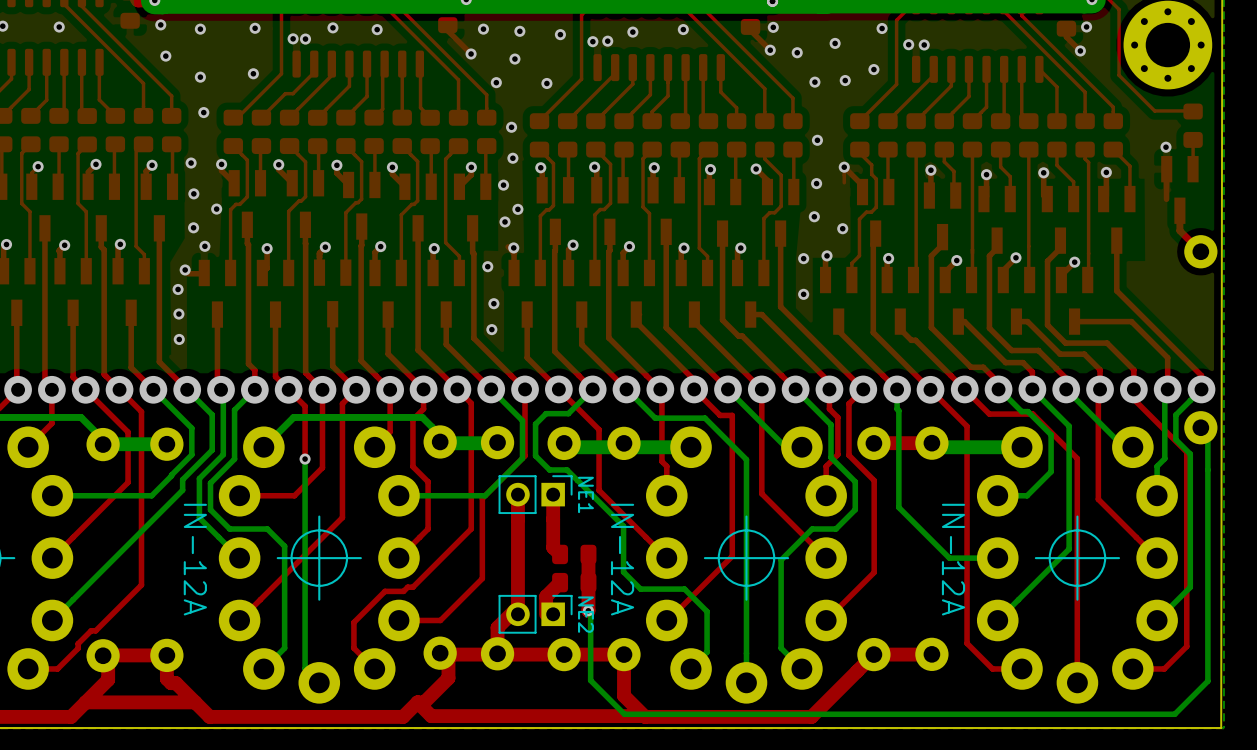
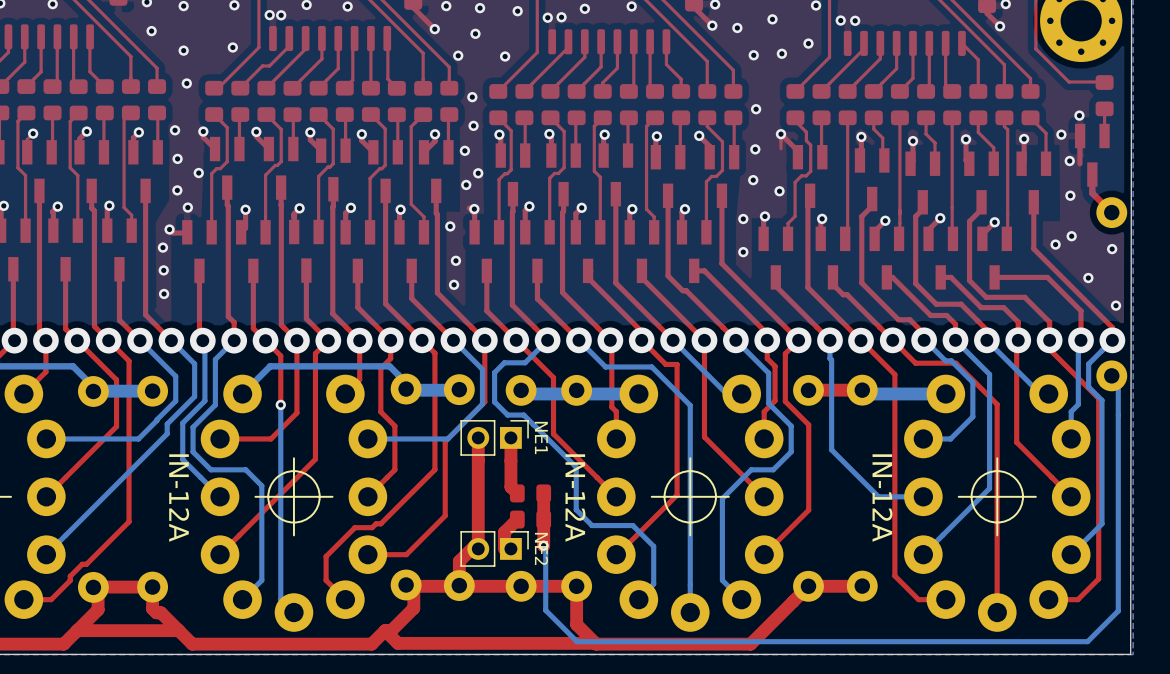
via: none -> (1061, 134)
via: none -> (1069, 161)
via: none -> (1070, 195)
via: none -> (1071, 236)
via: none -> (1055, 244)
via: none -> (1112, 249)
via: none -> (1088, 278)
via: none -> (1116, 305)

